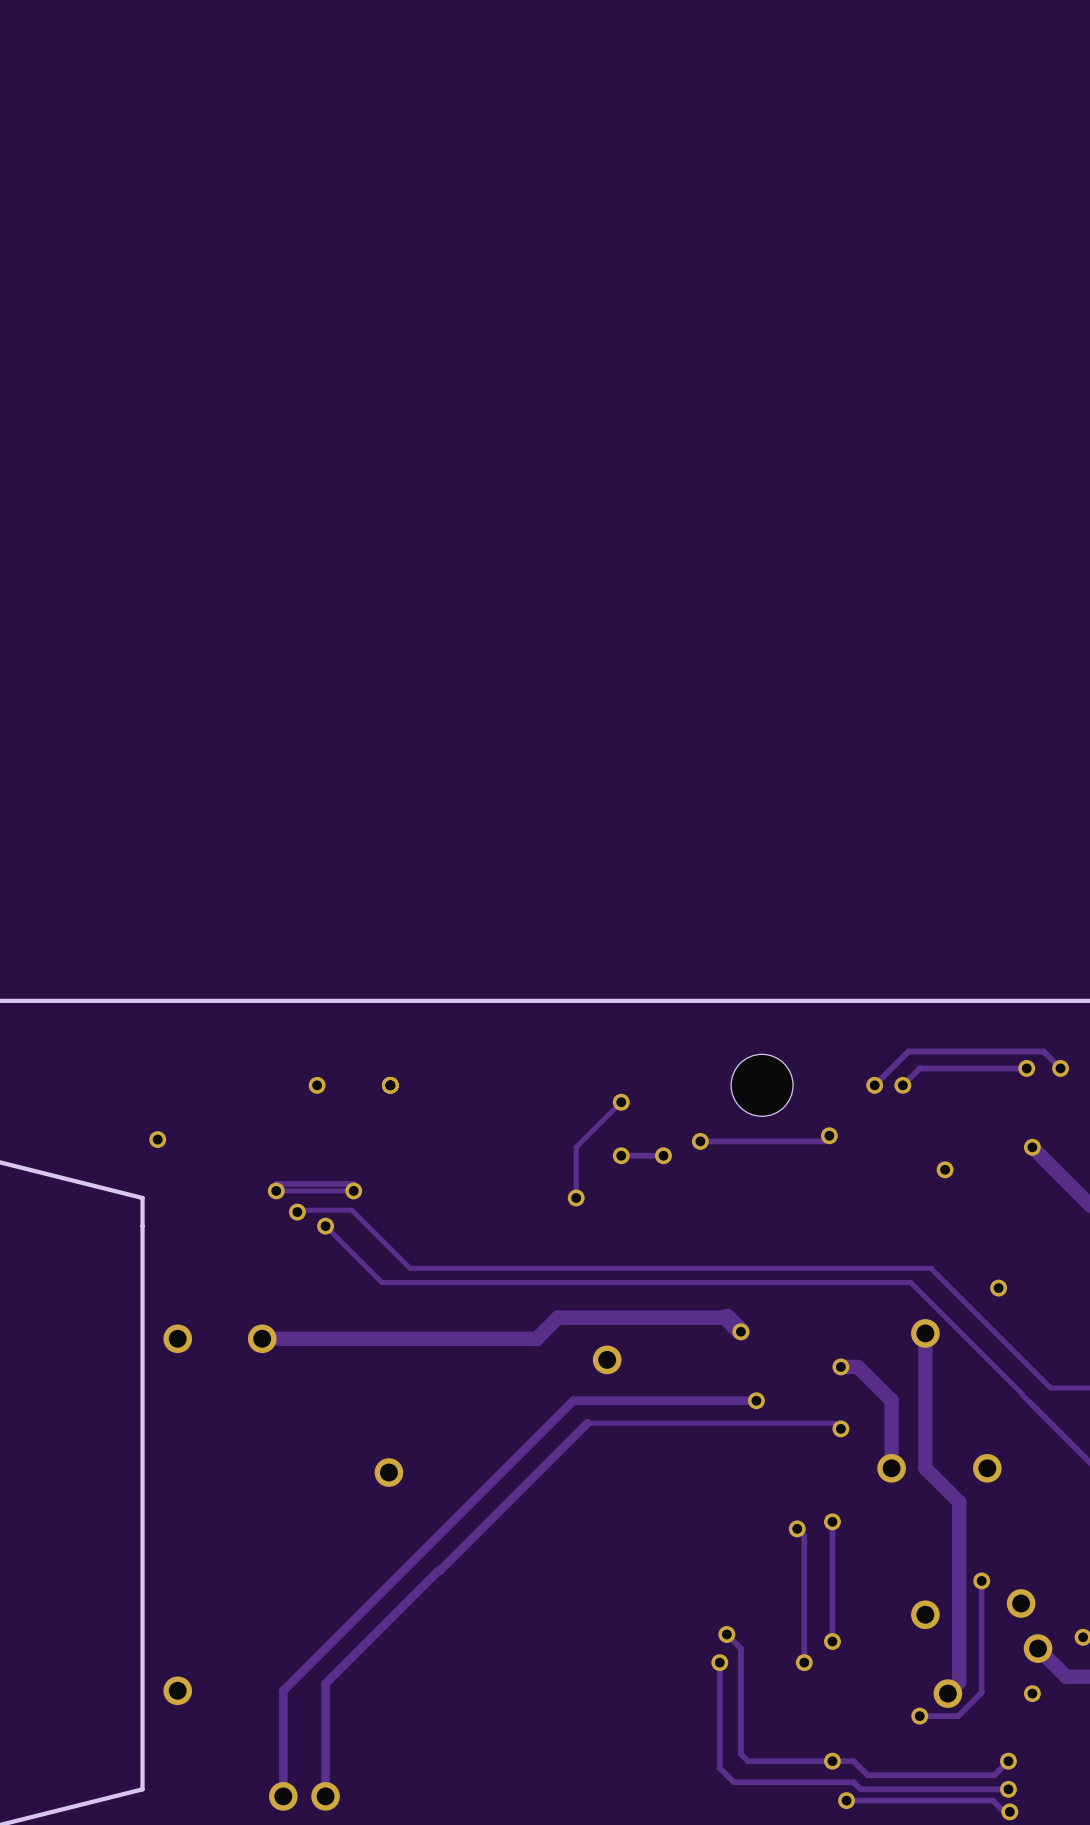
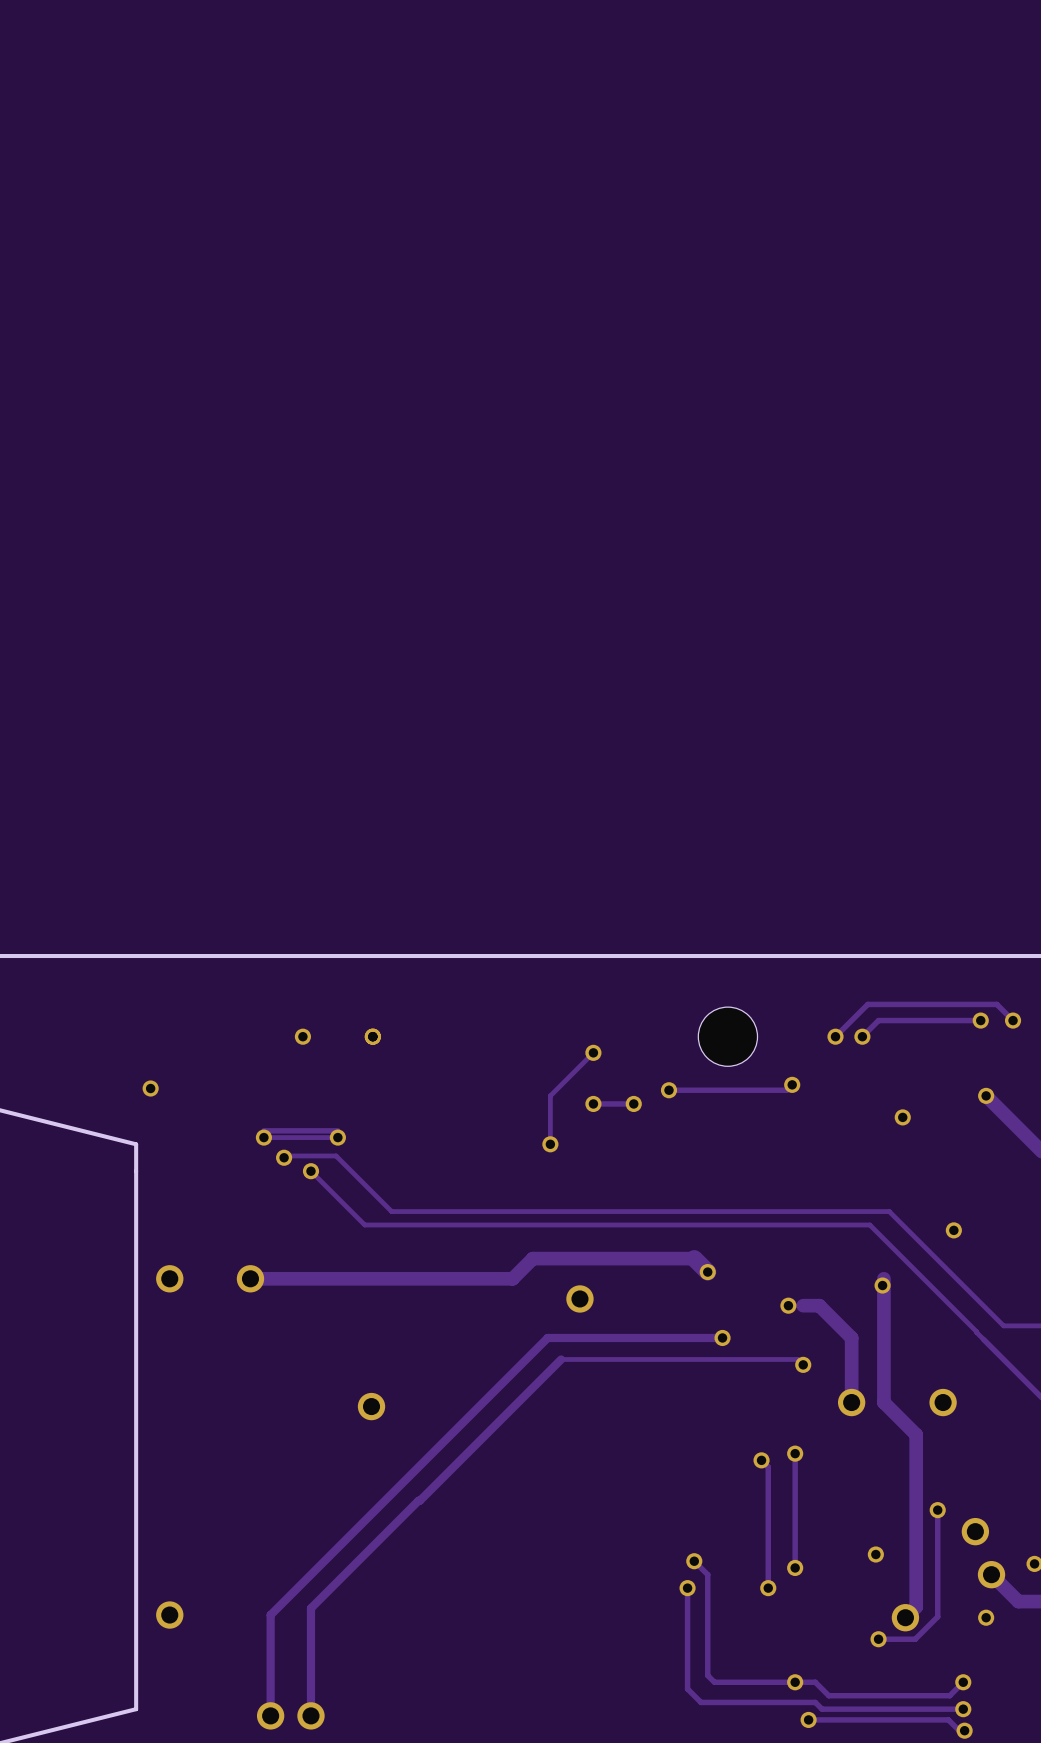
via size: [911, 1319, 940, 1348] -> [874, 1277, 891, 1294]
via position: (840, 1366) -> (788, 1305)
via size: [911, 1600, 940, 1630] -> [867, 1546, 884, 1563]

